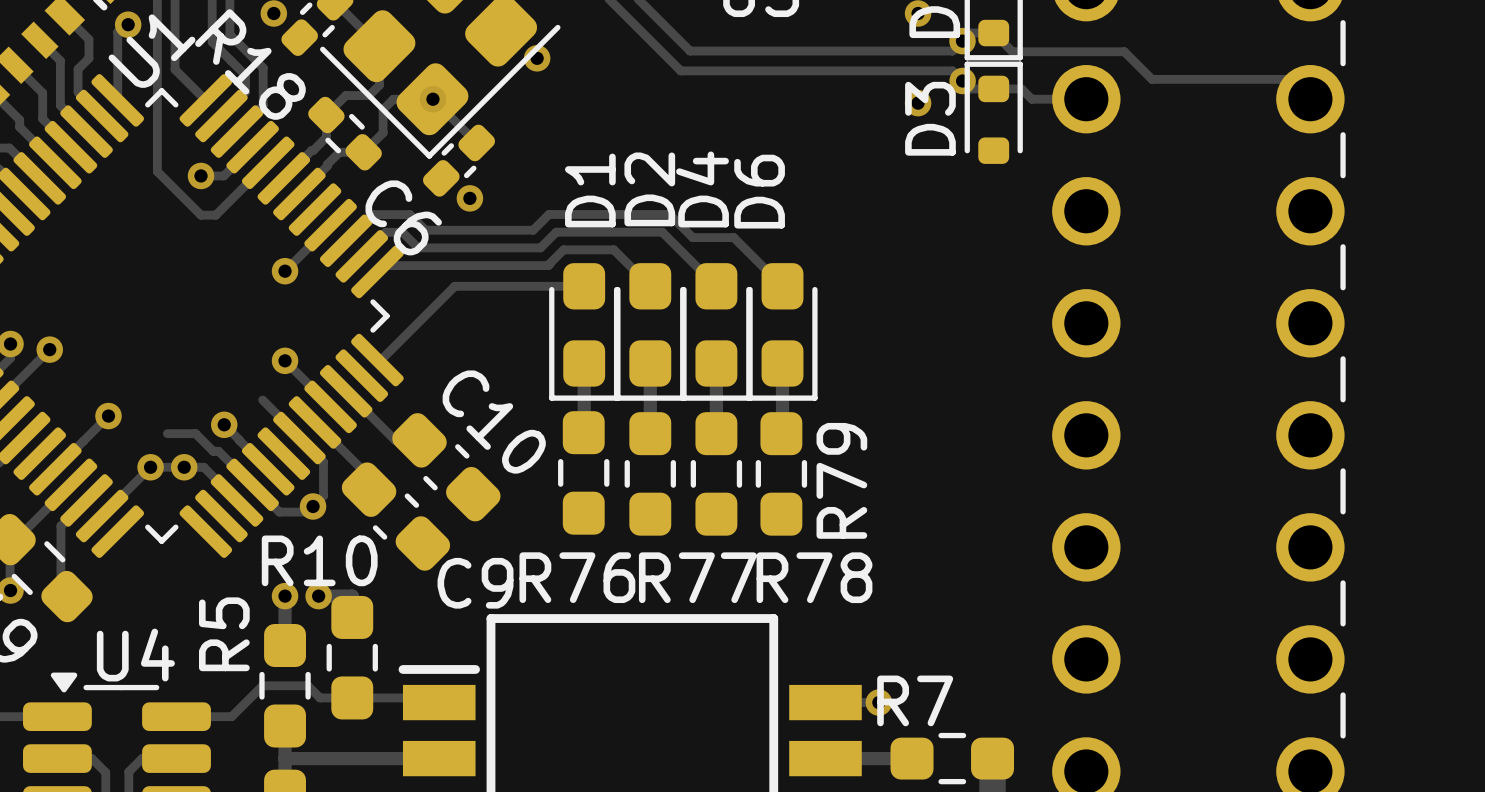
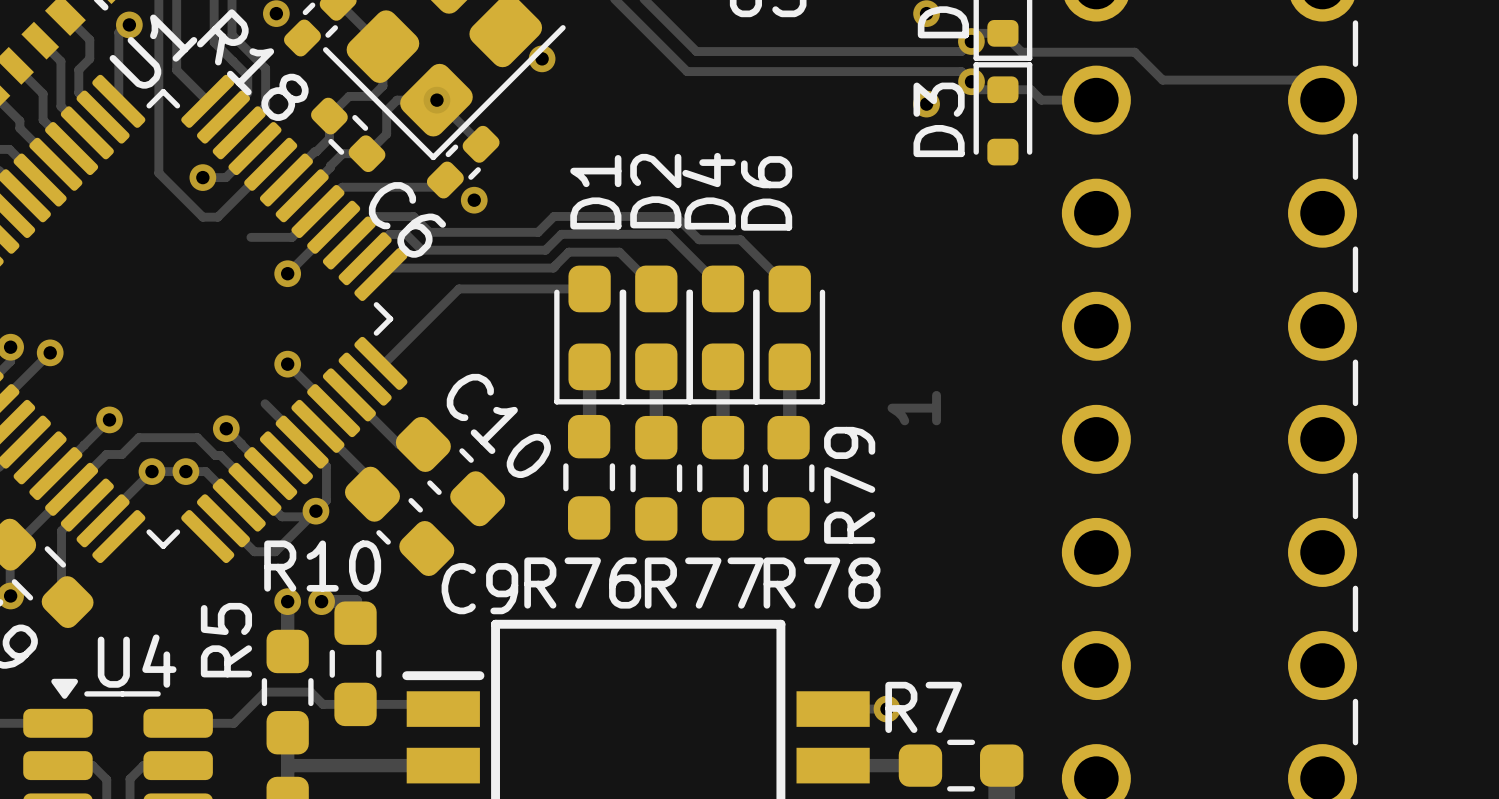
track: none -> (445, 180) (438, 187) (342, 187) (292, 237) (250, 237)
drawing: none -> [887, 390, 941, 426]
track: none -> (168, 437) (138, 437) (122, 454) (106, 454) (71, 489)
track: none -> (310, 516) (275, 551) (254, 551) (223, 520)

